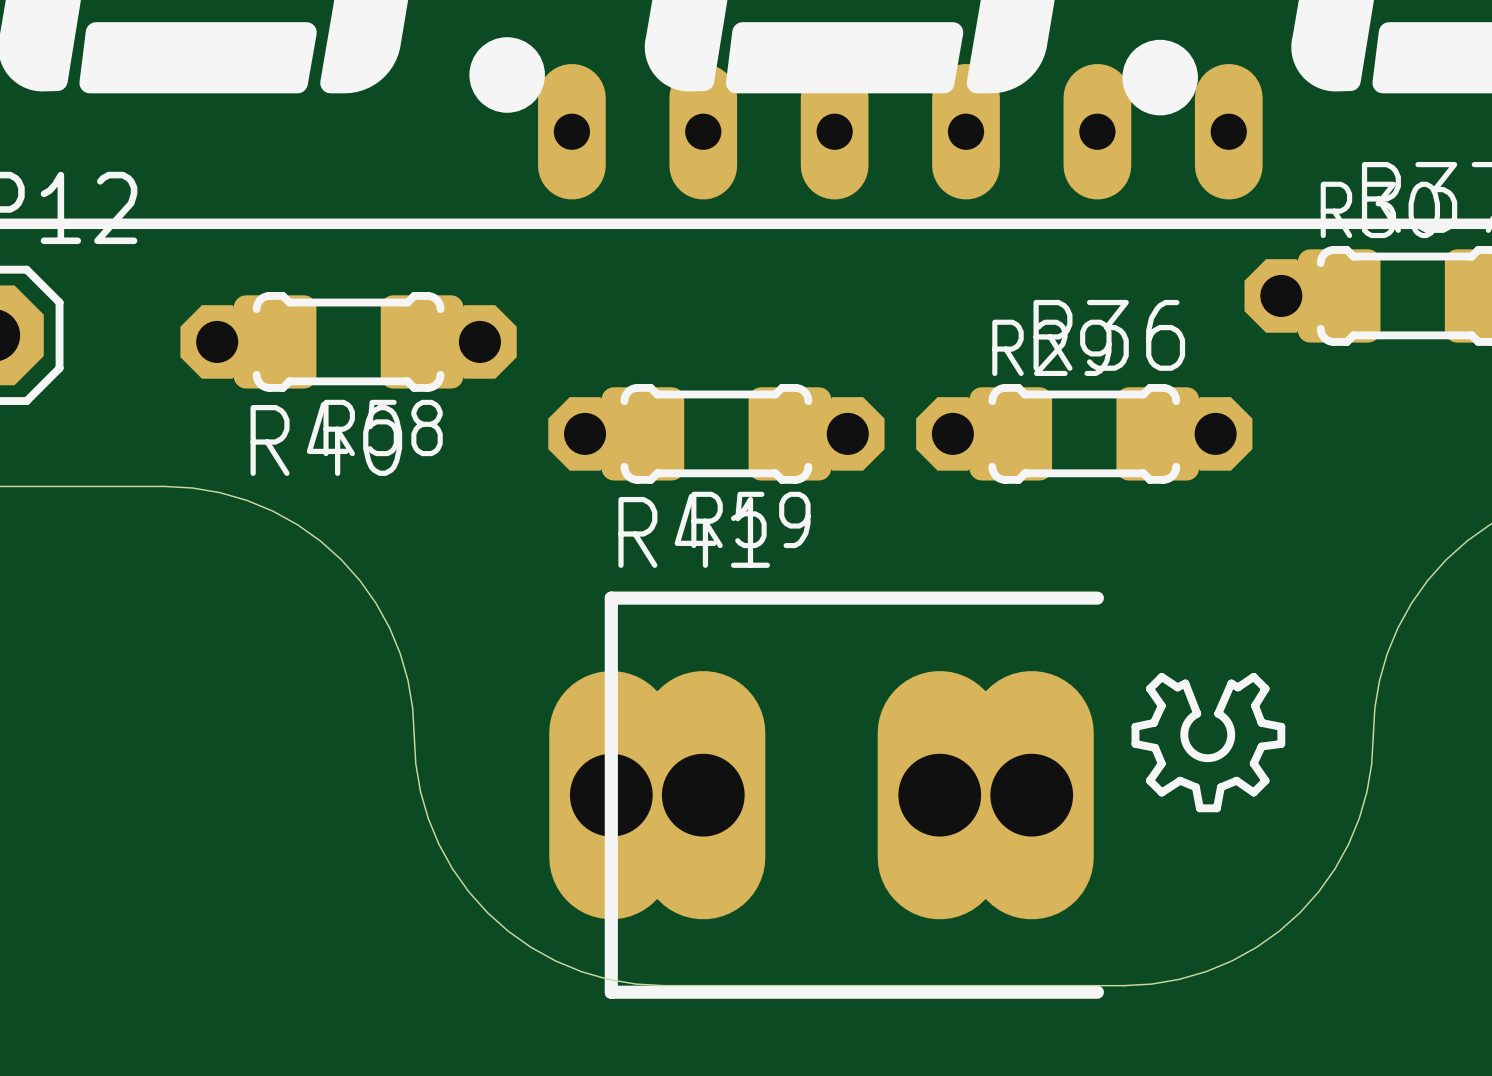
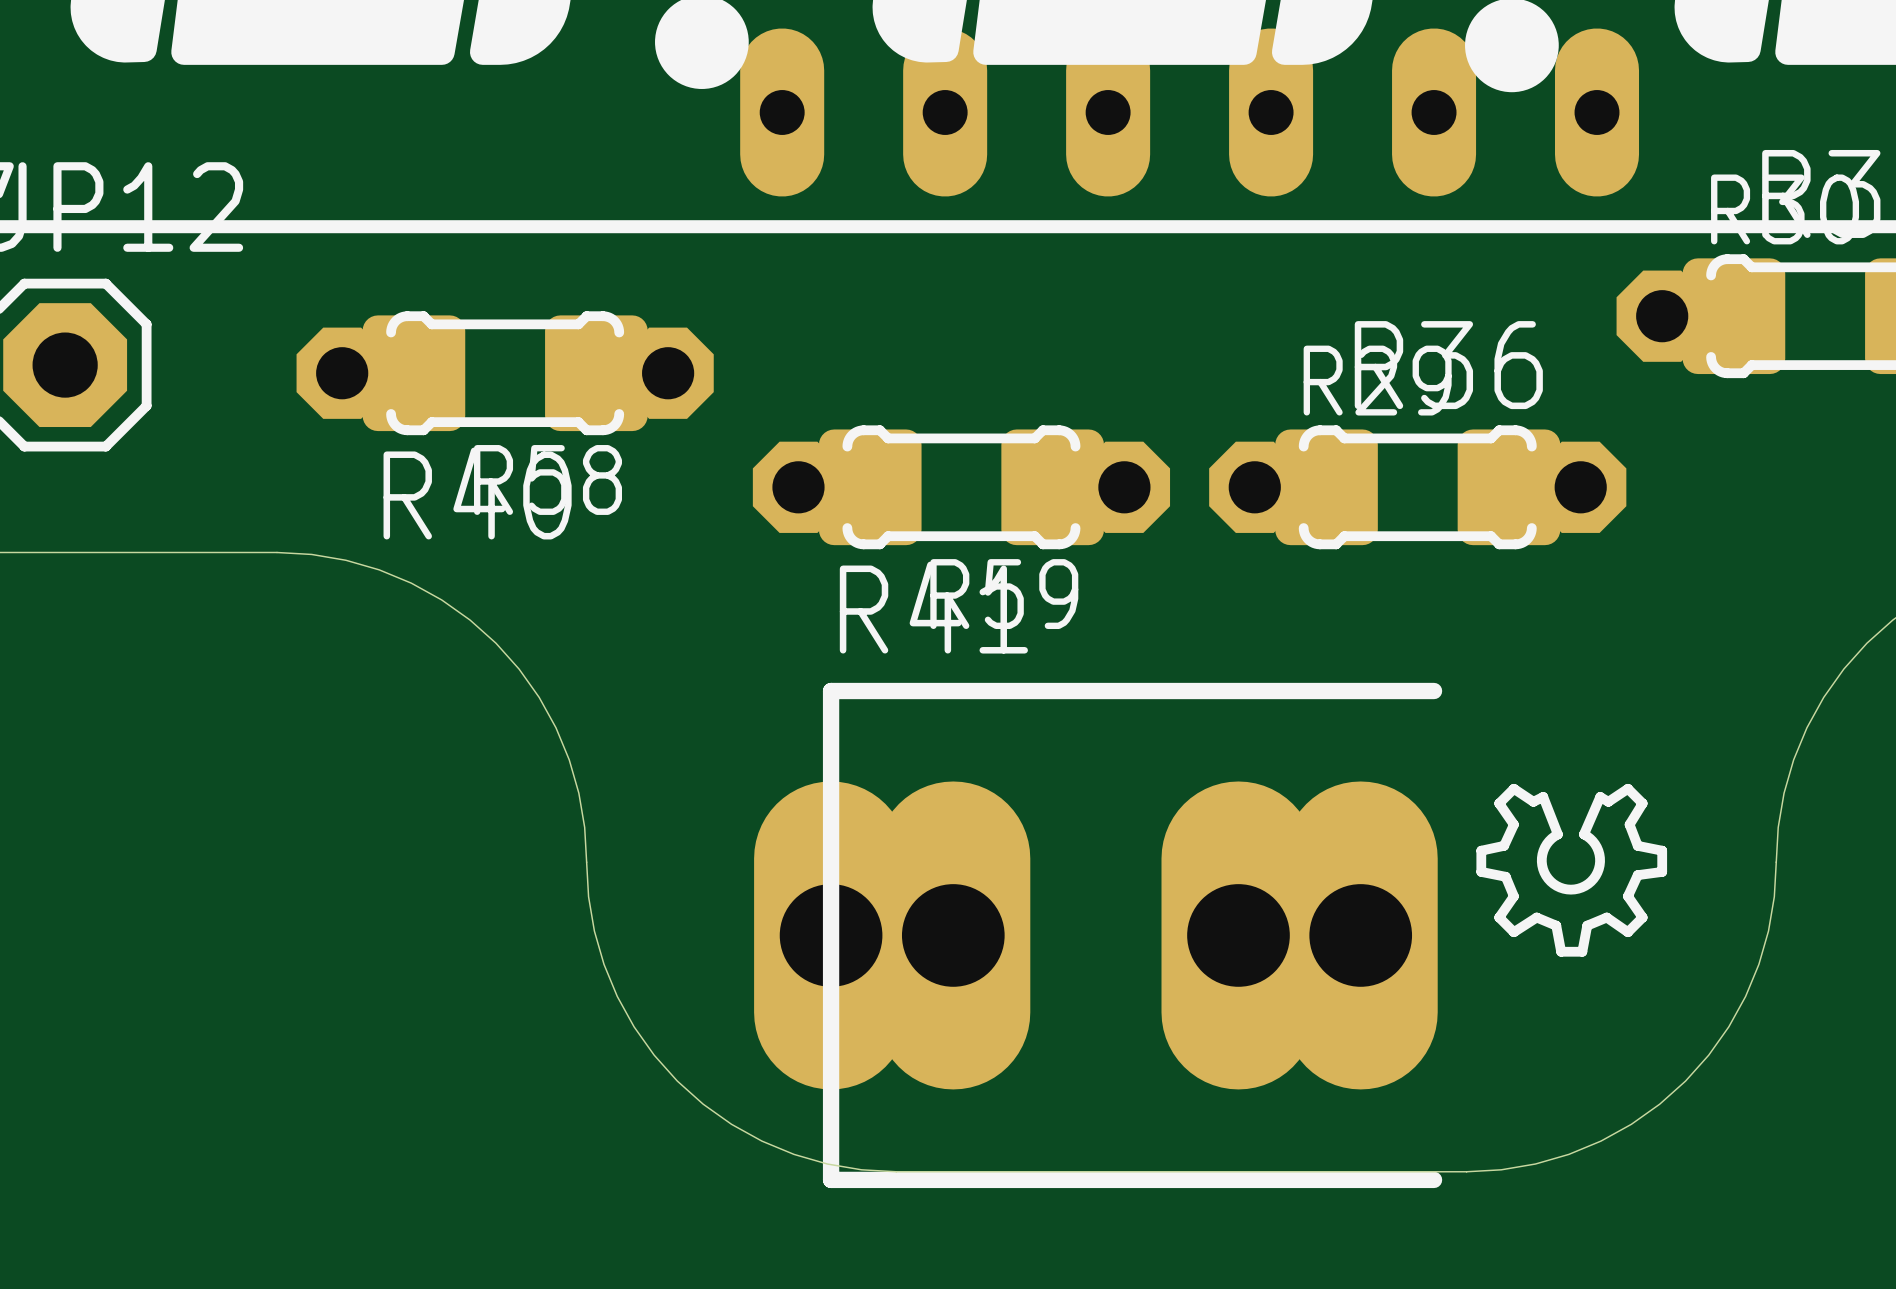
part footprint: [549, 591, 1104, 999] -> [754, 682, 1443, 1189]

